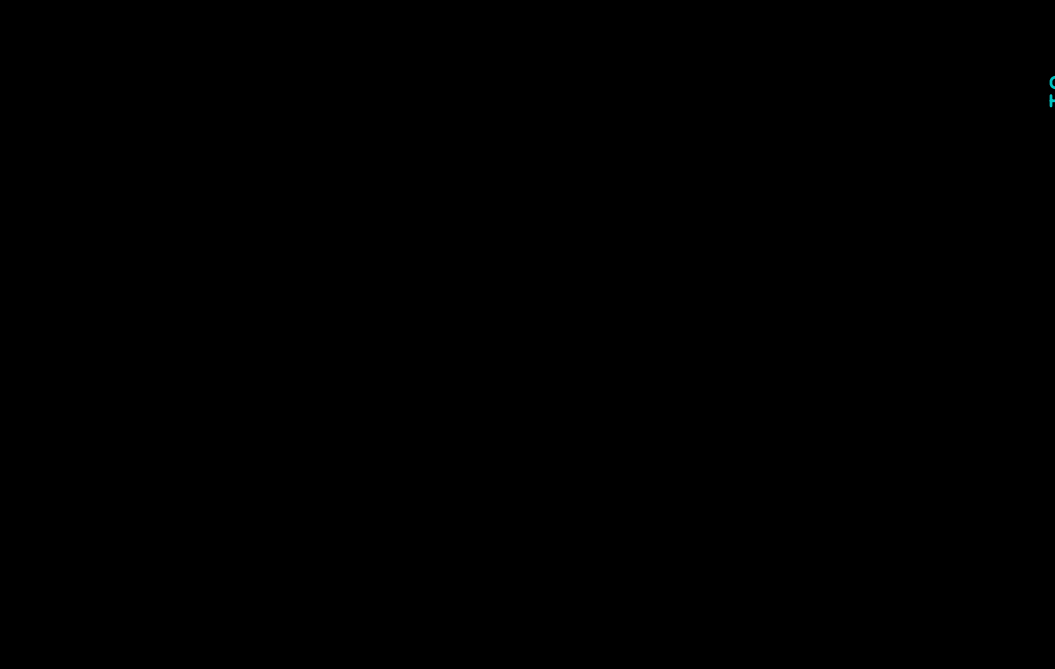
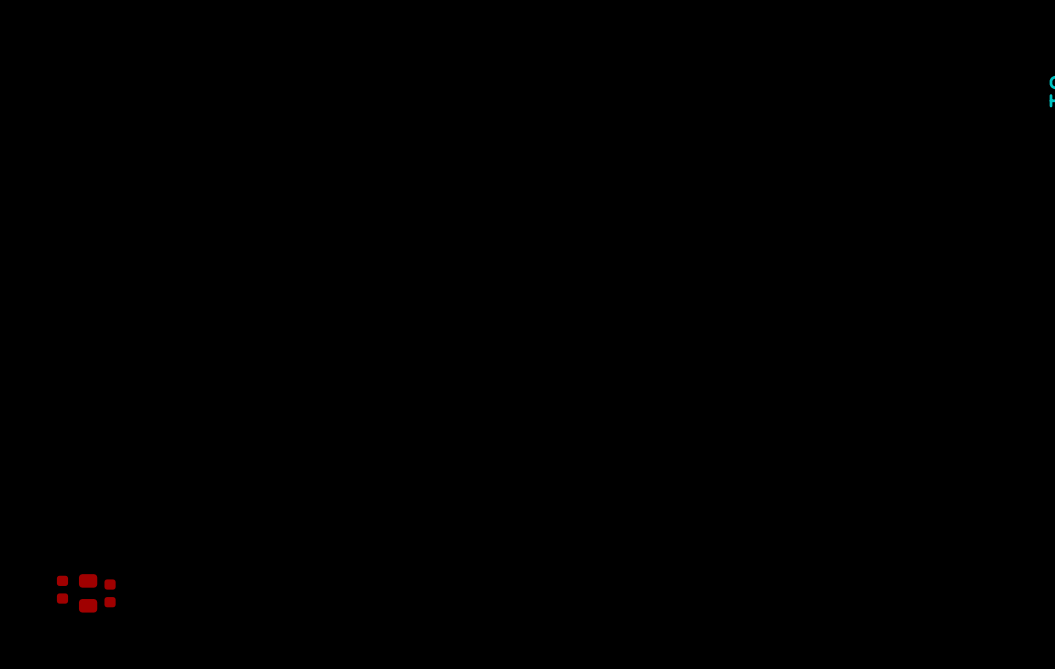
part: none -> (62, 589)
part: none -> (88, 593)
part: none -> (110, 593)

